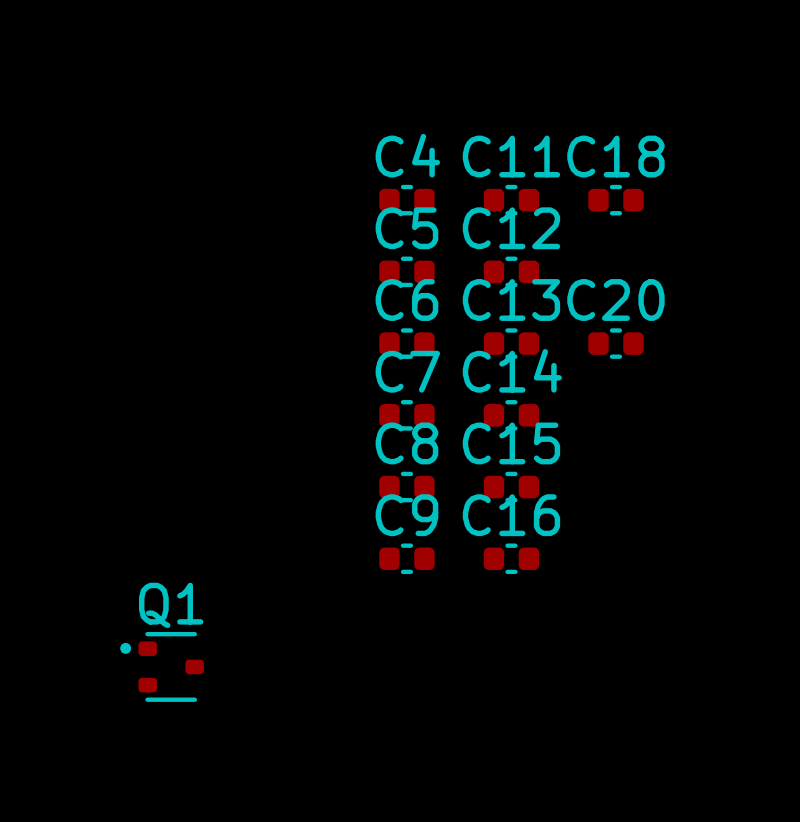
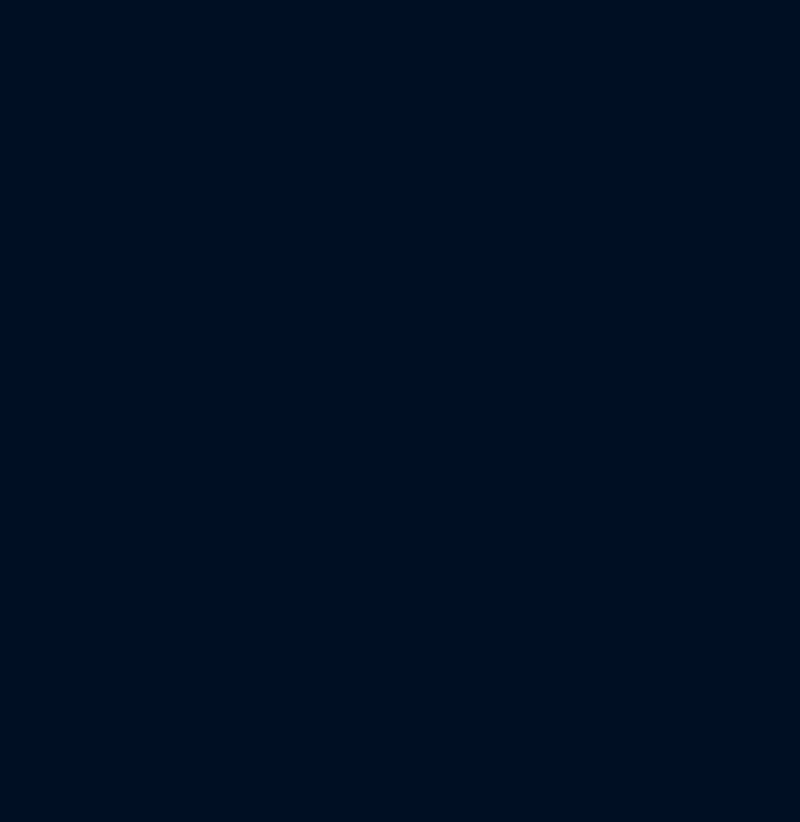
C4: (406, 200) -> none
C11: (511, 200) -> none
C18: (615, 200) -> none
C5: (406, 271) -> none
C12: (511, 271) -> none
C6: (406, 343) -> none
C13: (511, 343) -> none
C20: (615, 343) -> none
C7: (406, 415) -> none
C14: (511, 415) -> none
C8: (406, 487) -> none
C15: (511, 487) -> none
C9: (406, 558) -> none
C16: (511, 558) -> none
Q1: (162, 666) -> none

